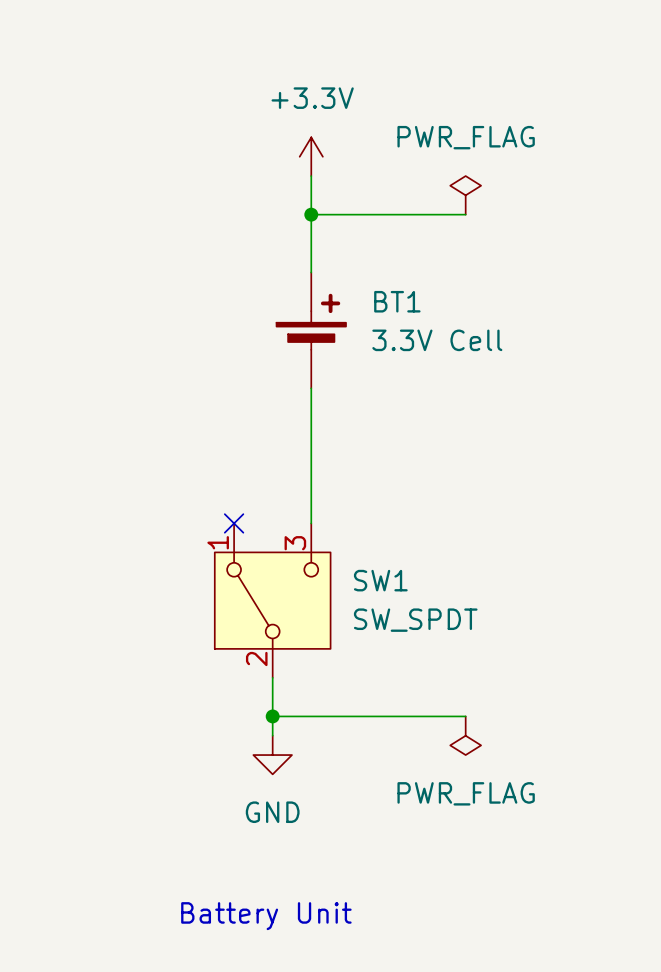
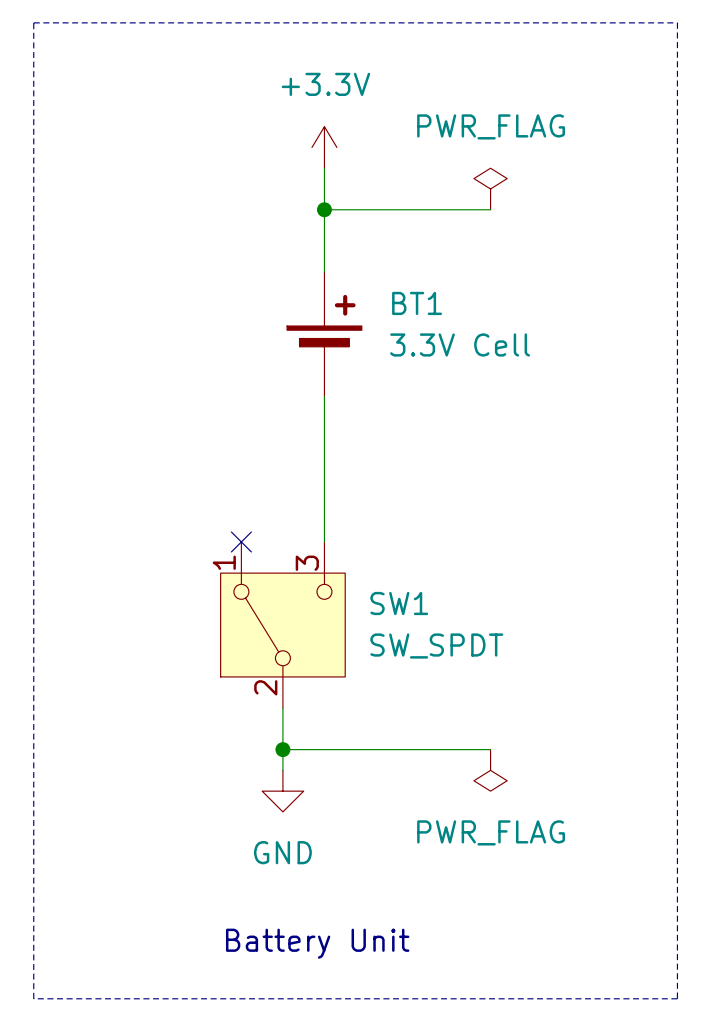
line: none -> (33, 22) (677, 22) (677, 998) (33, 998) (33, 22)
text position: Battery Unit (266, 916) -> Battery Unit (317, 943)

